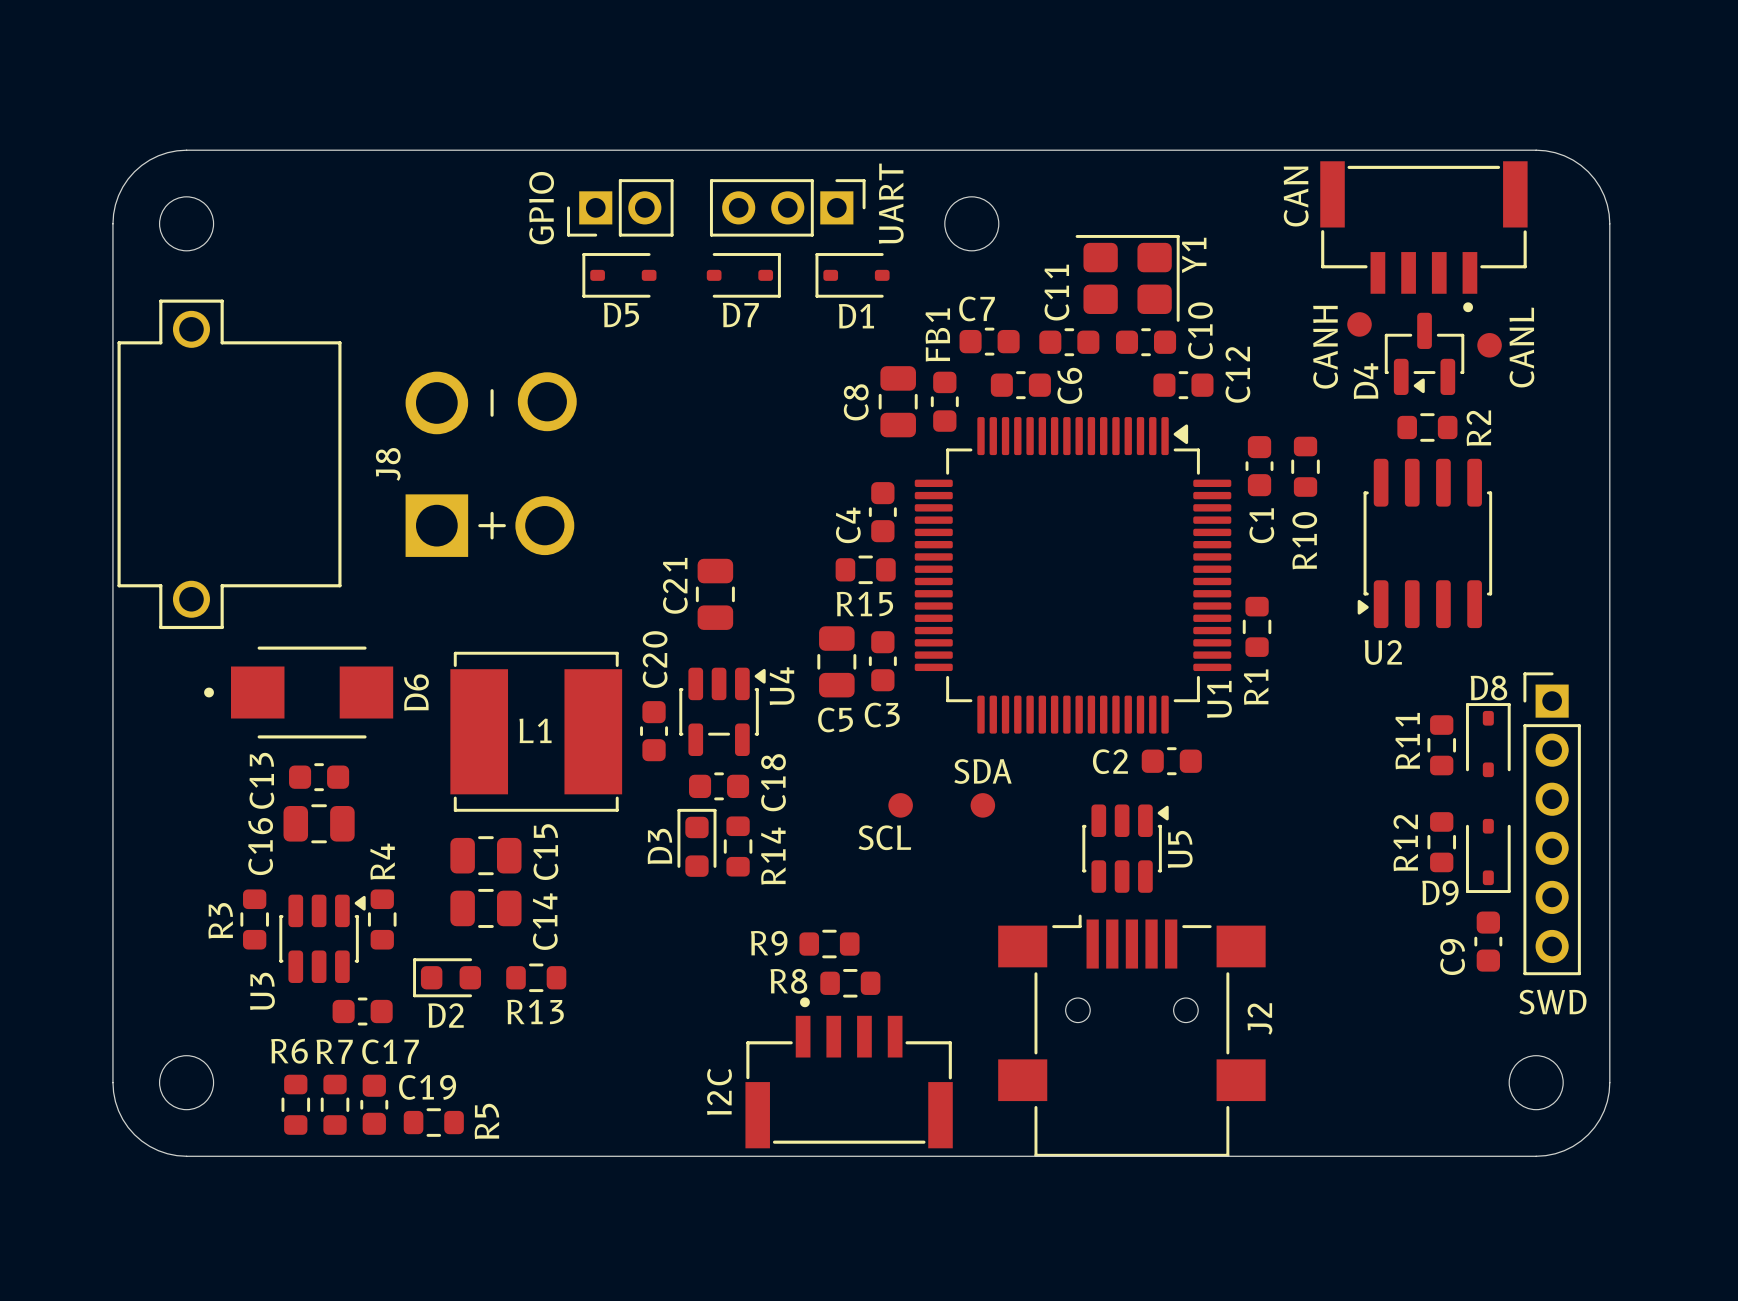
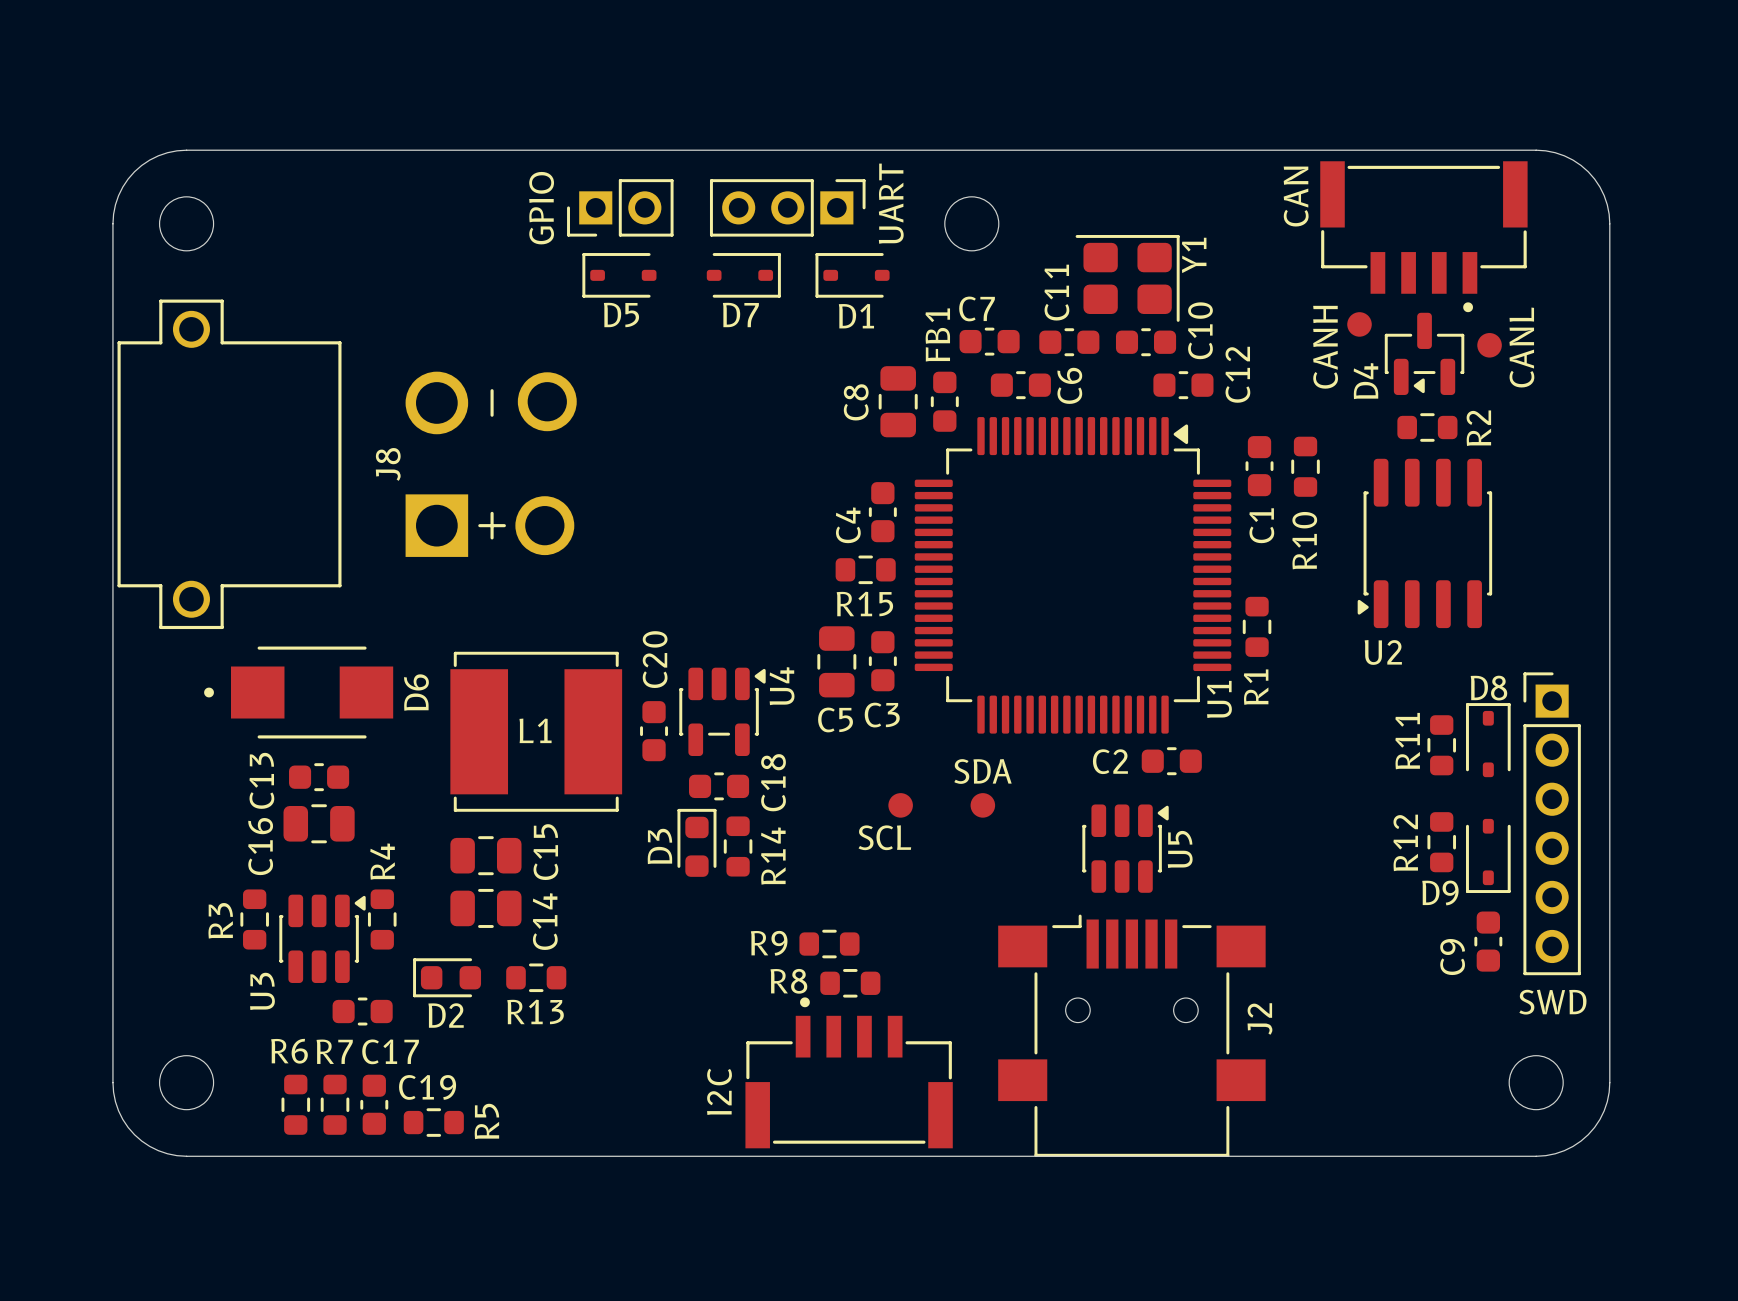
C21: (715, 594) -> none

